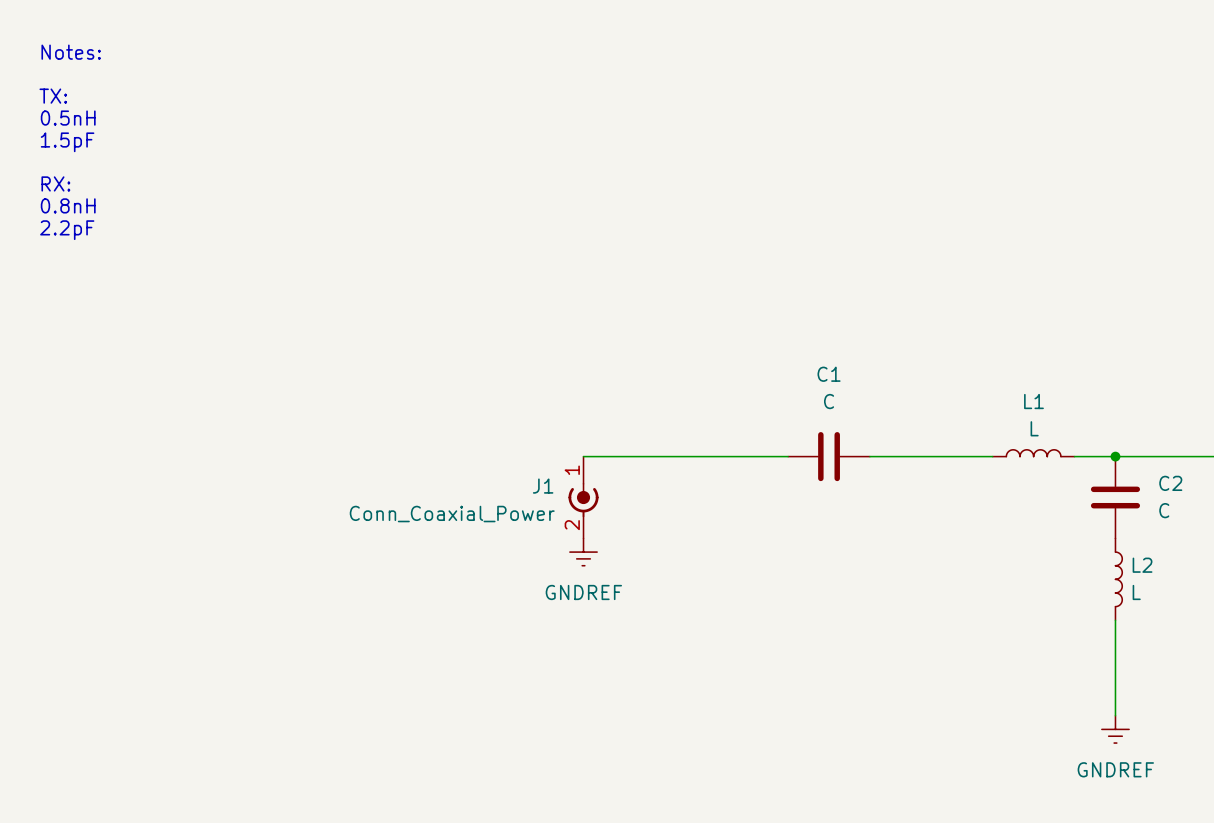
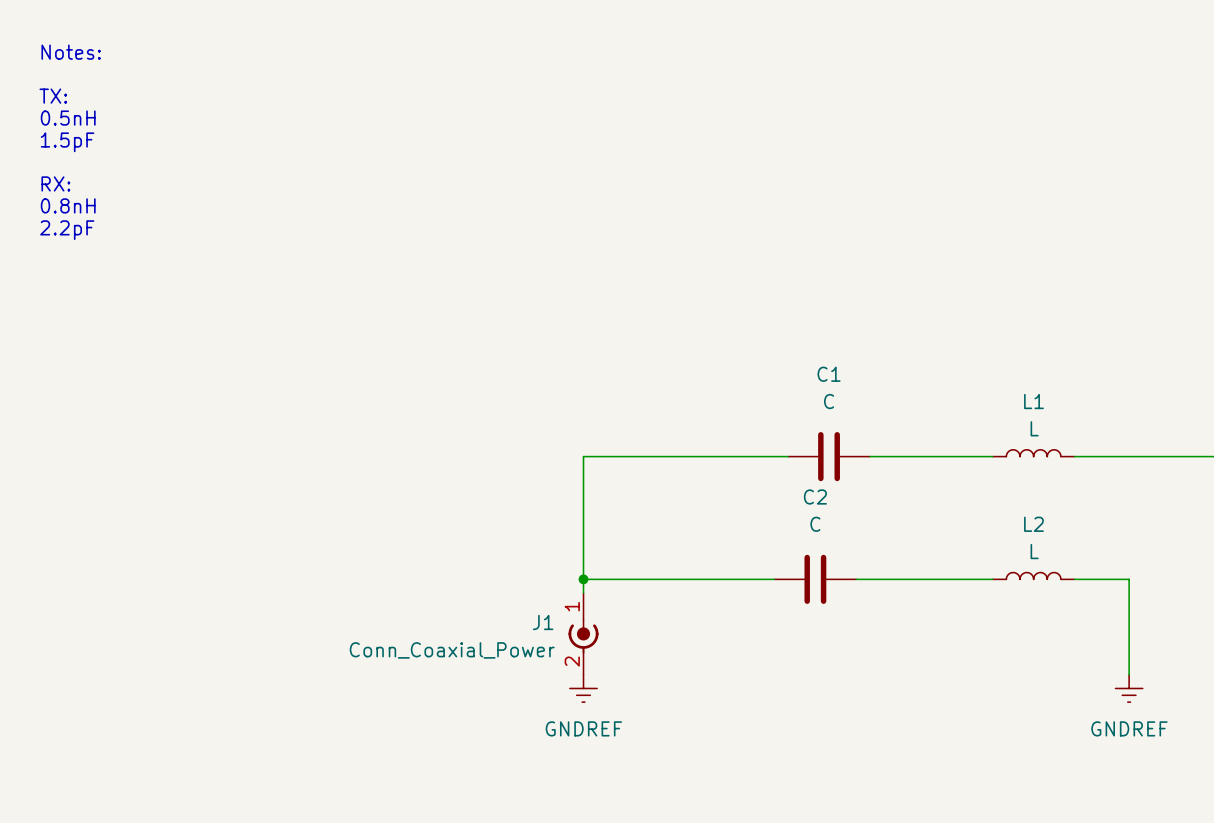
junction: (1115, 456) -> none
C2 name position: C2 (1170, 483) -> C2 (815, 497)
J1 position: (583, 497) -> (583, 633)
C2 rotation: 0° (1115, 497) -> 90° clockwise (815, 579)
C2 position: (1115, 497) -> (815, 579)
C2 value position: C (1164, 510) -> C (815, 524)
power symbol position: GNDREF (583, 552) -> GNDREF (583, 688)
L2 name position: L2 (1142, 565) -> L2 (1033, 524)
wire: none -> (583, 579) (774, 579)
junction: none -> (583, 579)
wire: none -> (856, 579) (992, 579)
wire: none -> (1074, 579) (1129, 579) (1129, 674)
L2 rotation: 0° (1118, 579) -> 90° counterclockwise (1033, 575)
L2 position: (1118, 579) -> (1033, 575)
wire: (1115, 620) (1115, 715) -> none
power symbol position: GNDREF (1115, 729) -> GNDREF (1129, 688)

